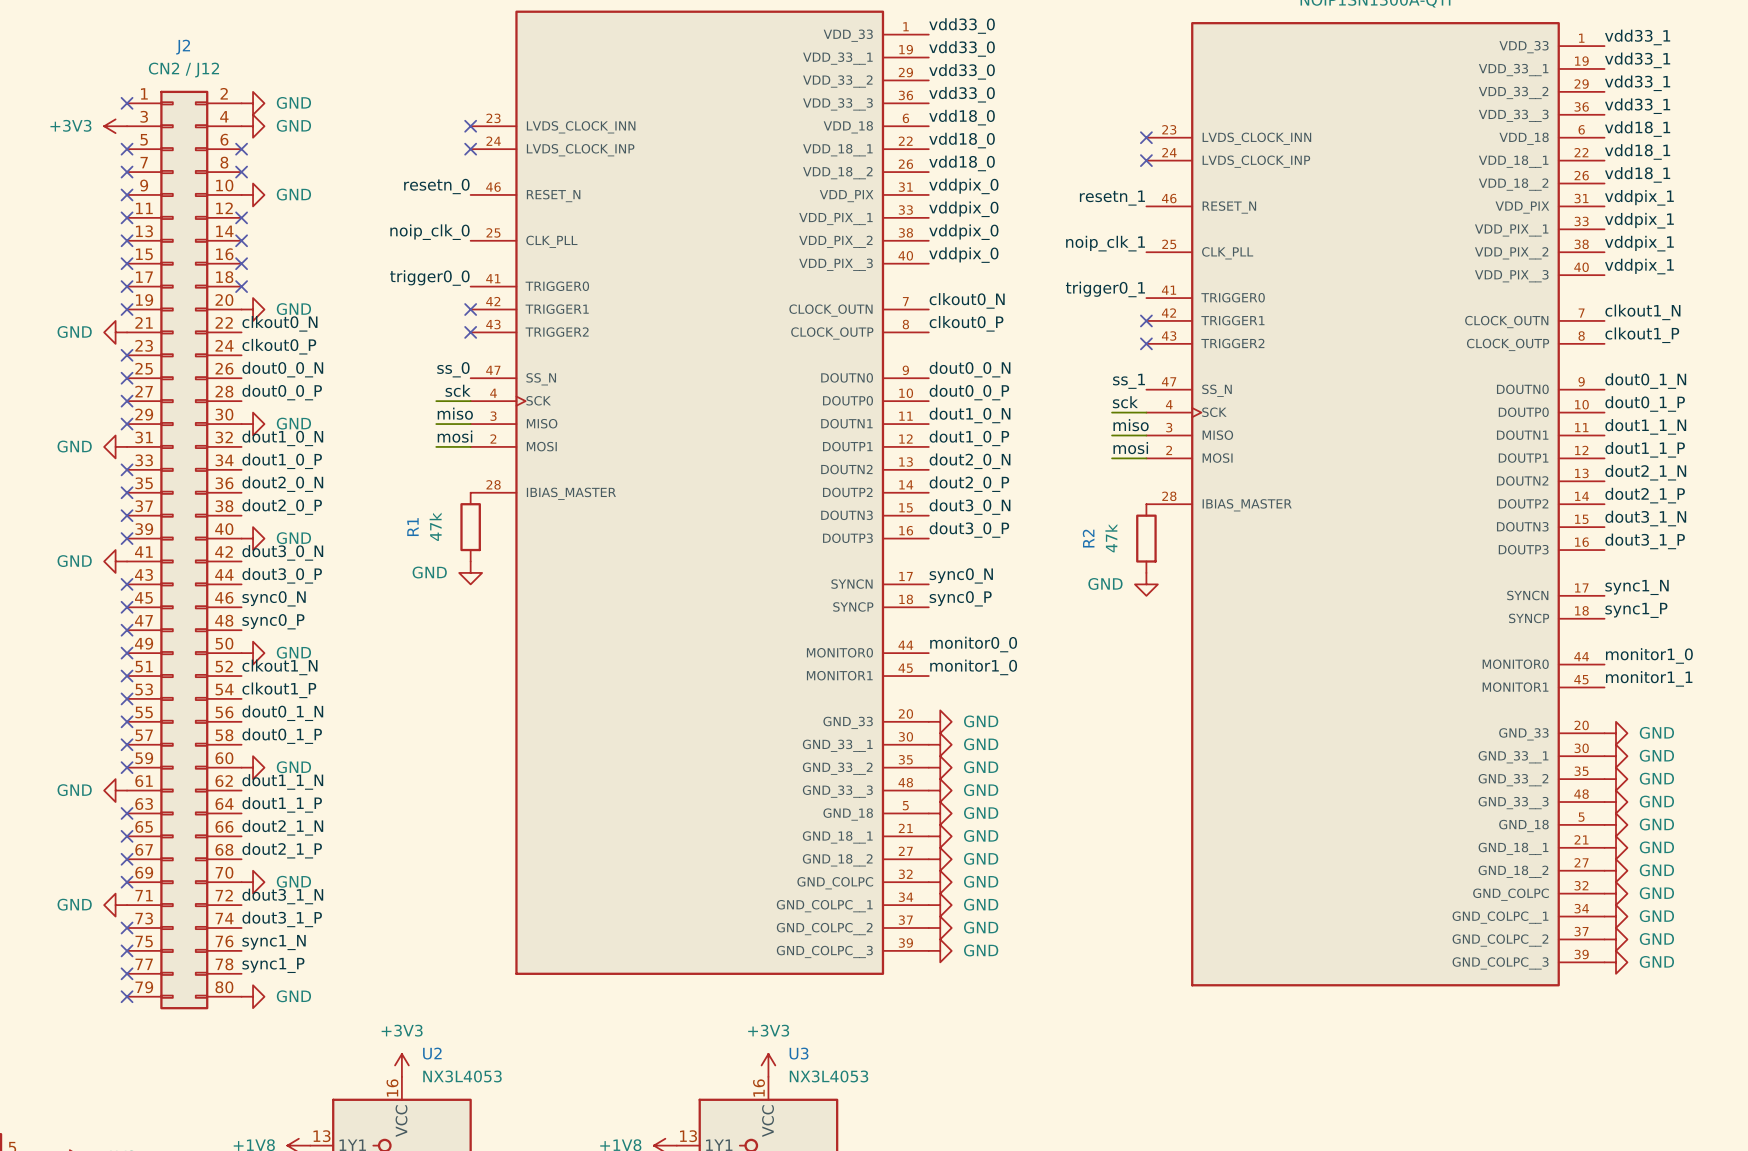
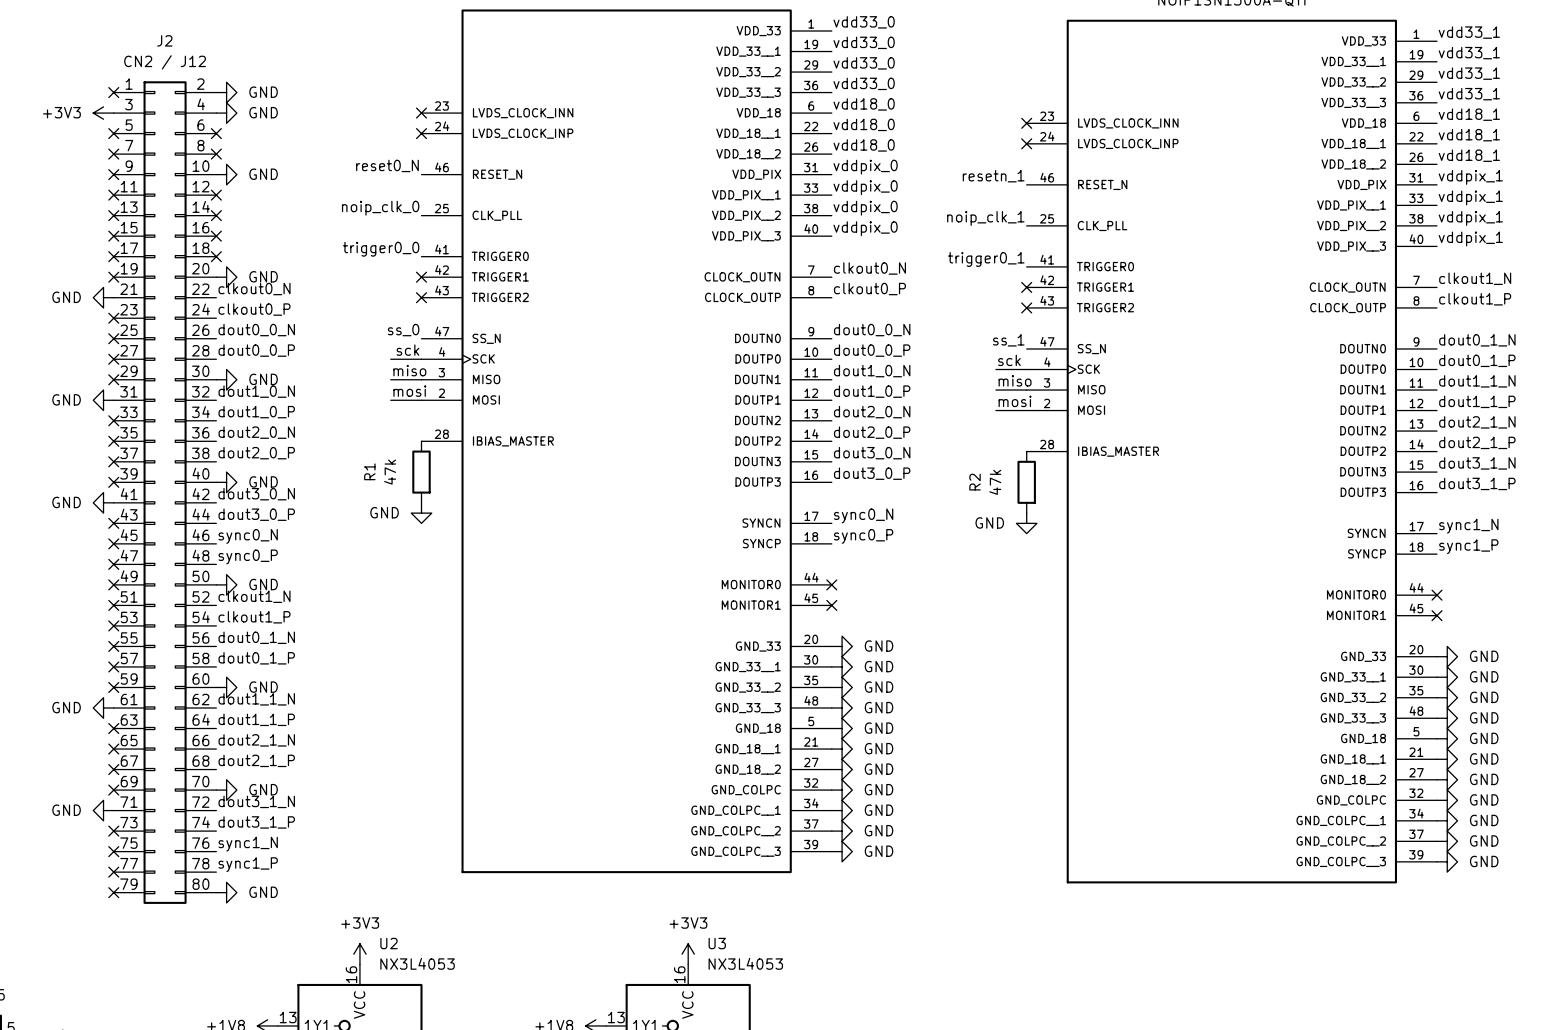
label: resetn_0 (436, 186) -> reset0_N (387, 165)
label: monitor0_0 (973, 644) -> none
no-connect mark: none -> (831, 584)
label: monitor1_0 (1649, 655) -> none
no-connect mark: none -> (1437, 595)
label: monitor1_0 (973, 667) -> none
no-connect mark: none -> (831, 605)
label: monitor1_1 (1649, 678) -> none
no-connect mark: none -> (1437, 615)

